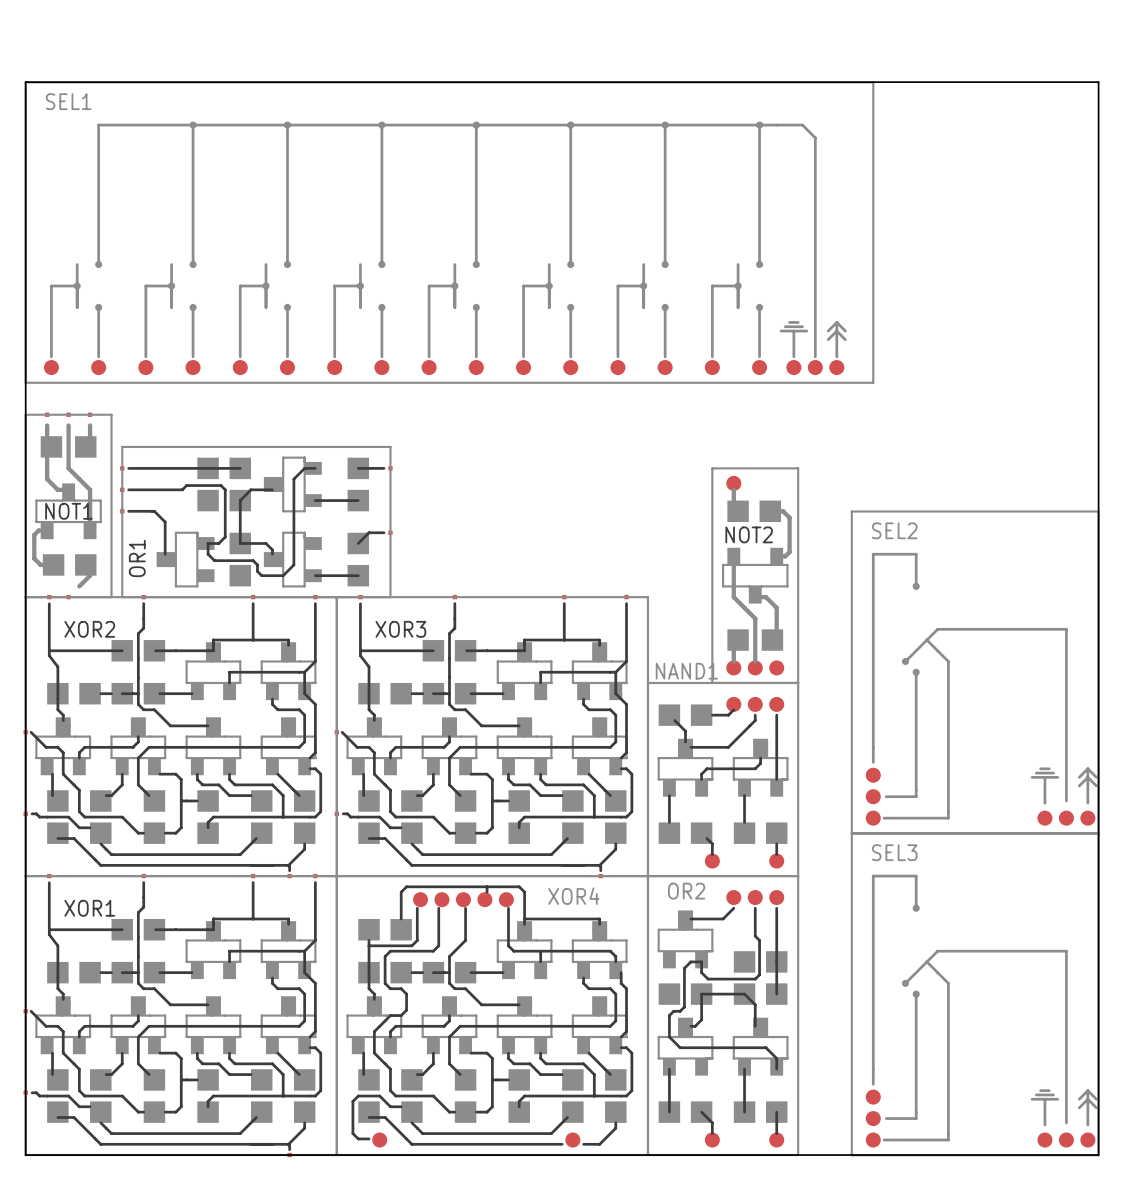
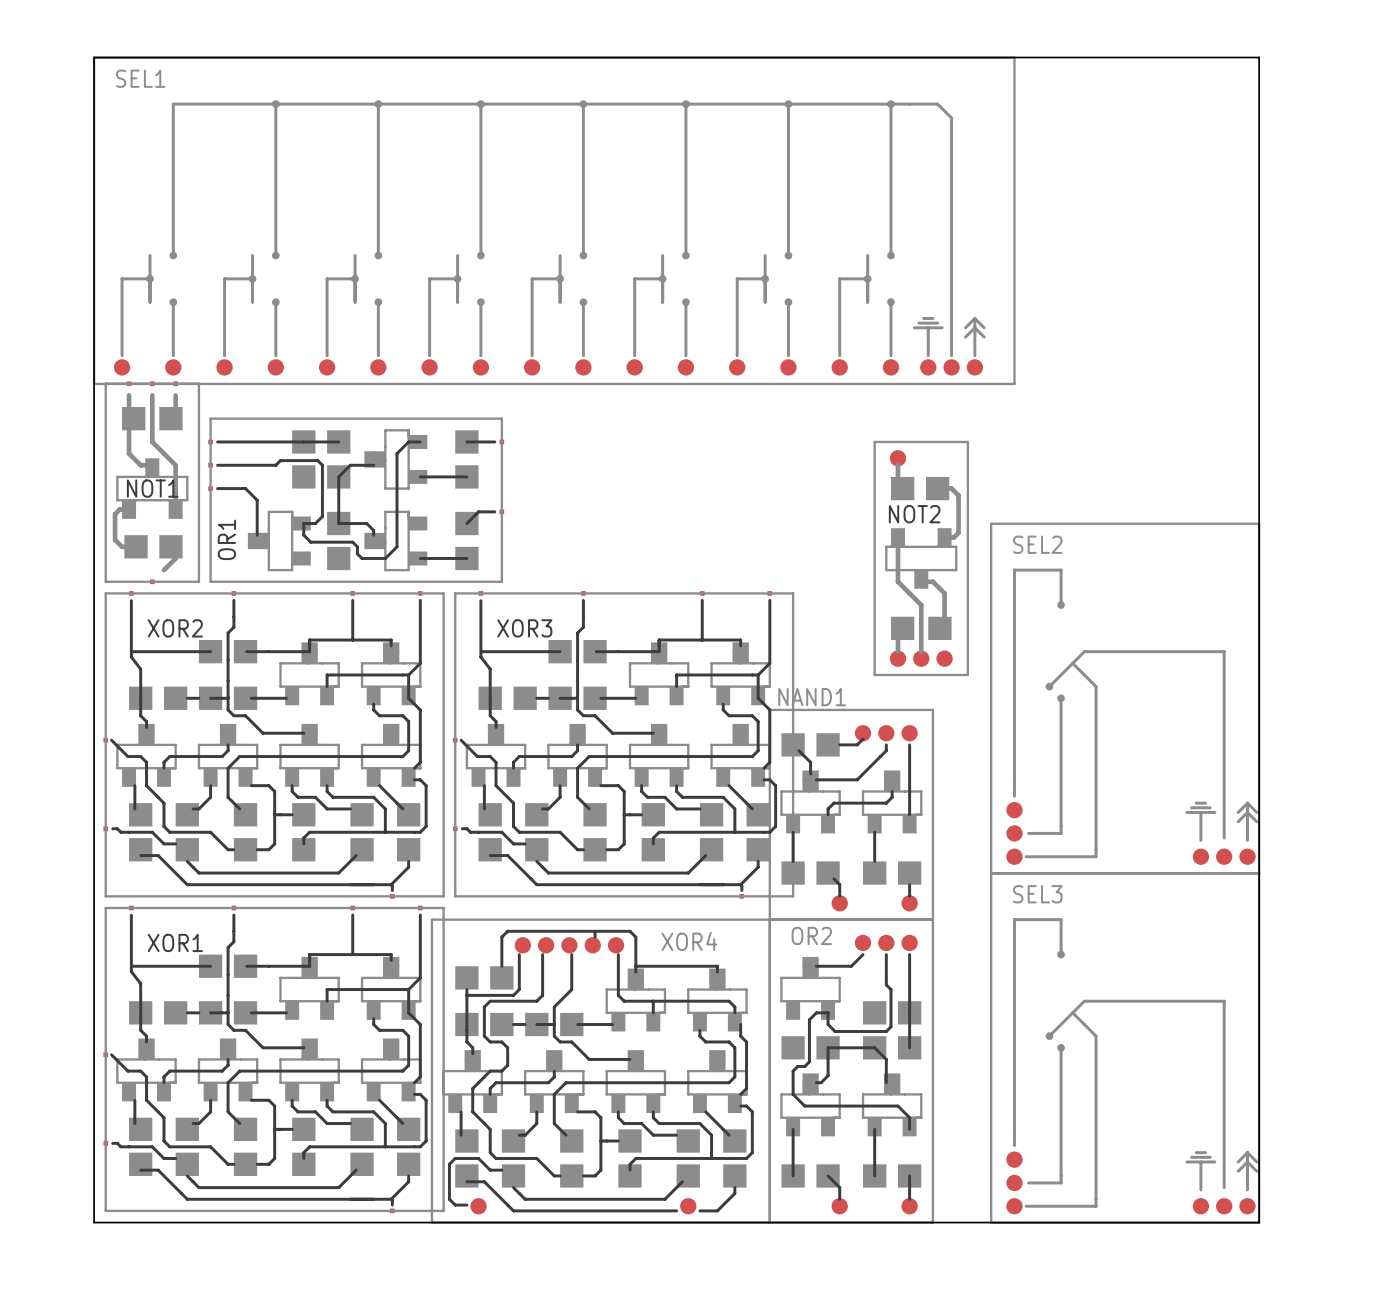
NOT1 position: (68, 505) -> (152, 482)
OR1 position: (256, 522) -> (356, 500)
NOT2 position: (755, 575) -> (921, 558)
XOR2 position: (180, 736) -> (274, 744)
XOR3 position: (491, 736) -> (623, 744)
XOR1 position: (180, 1015) -> (274, 1059)

